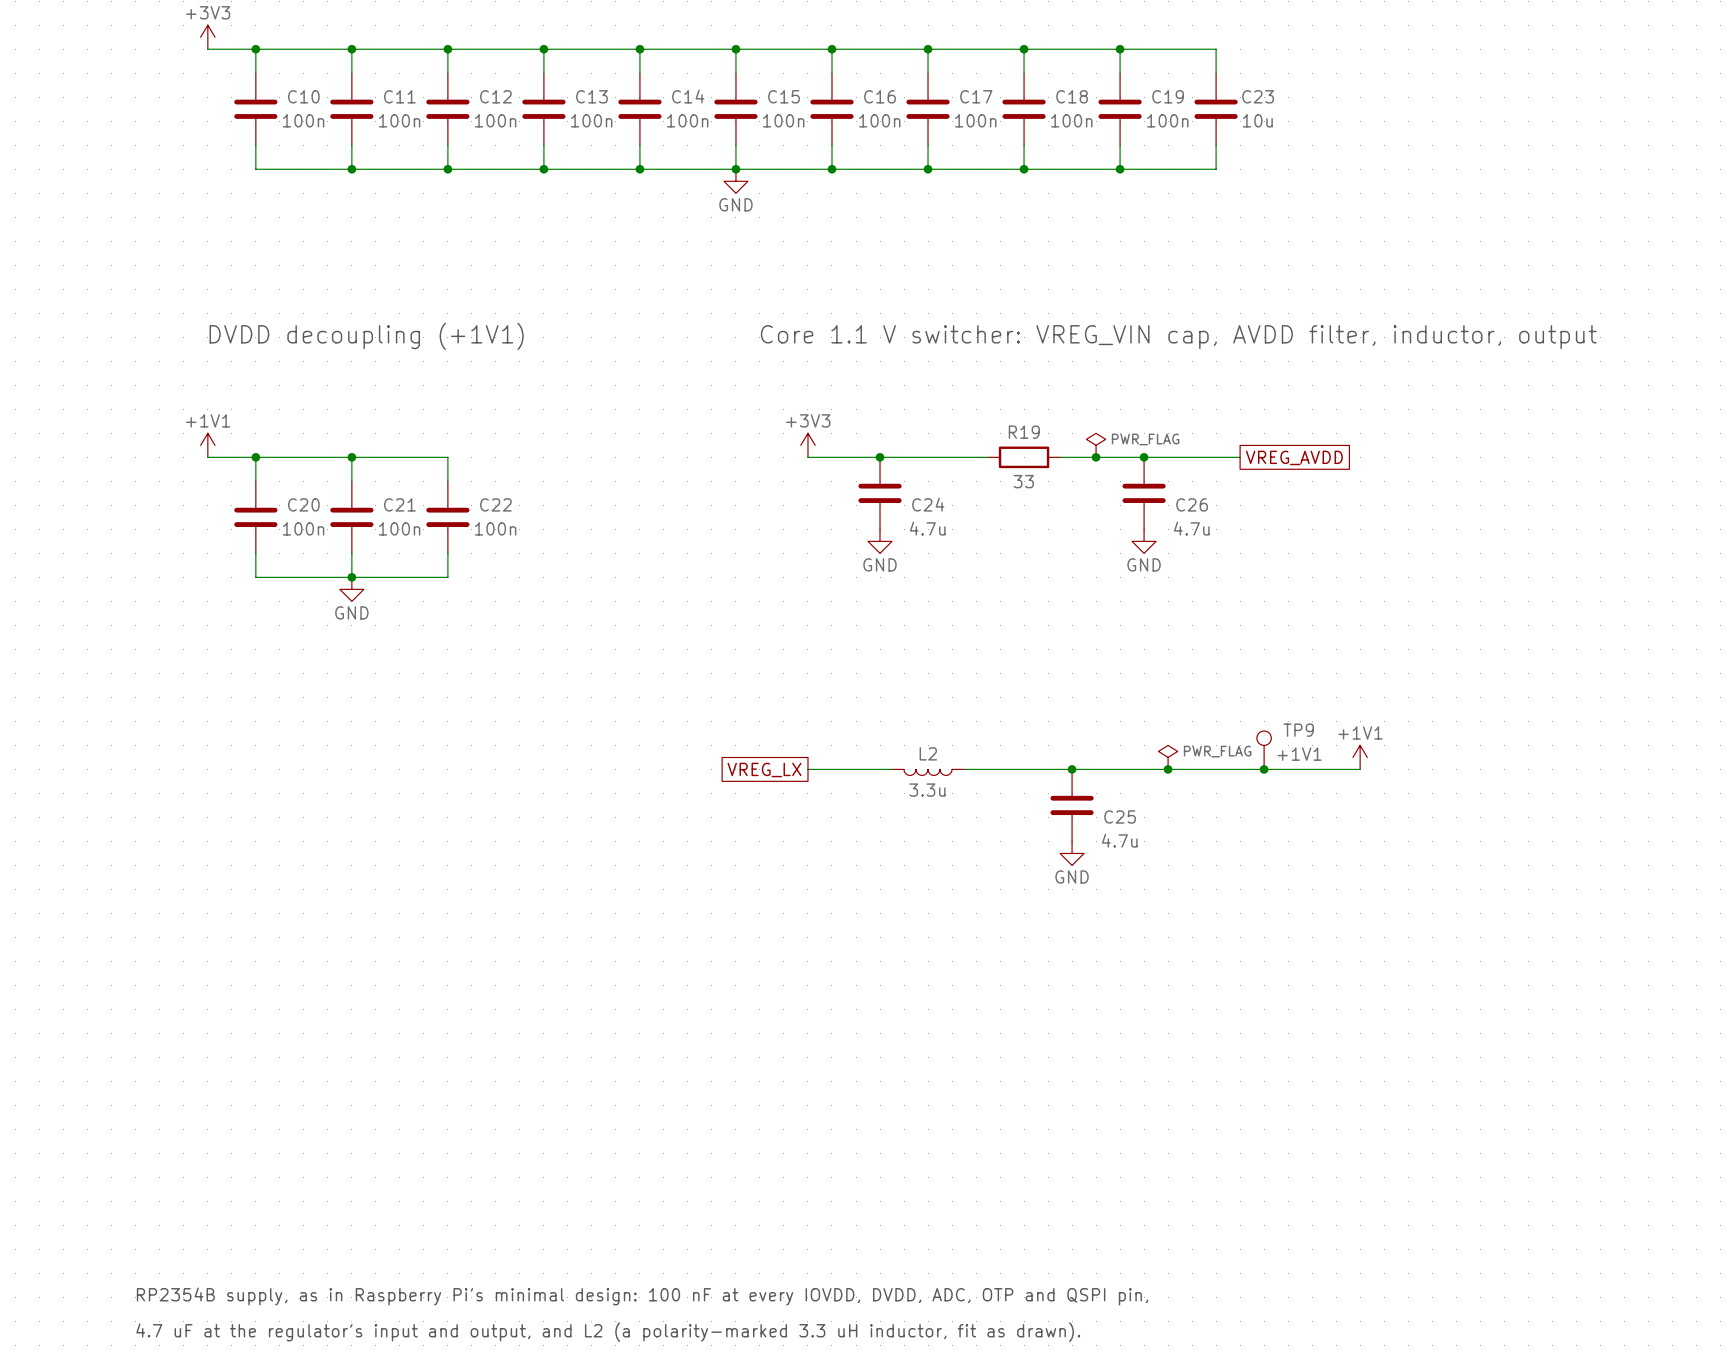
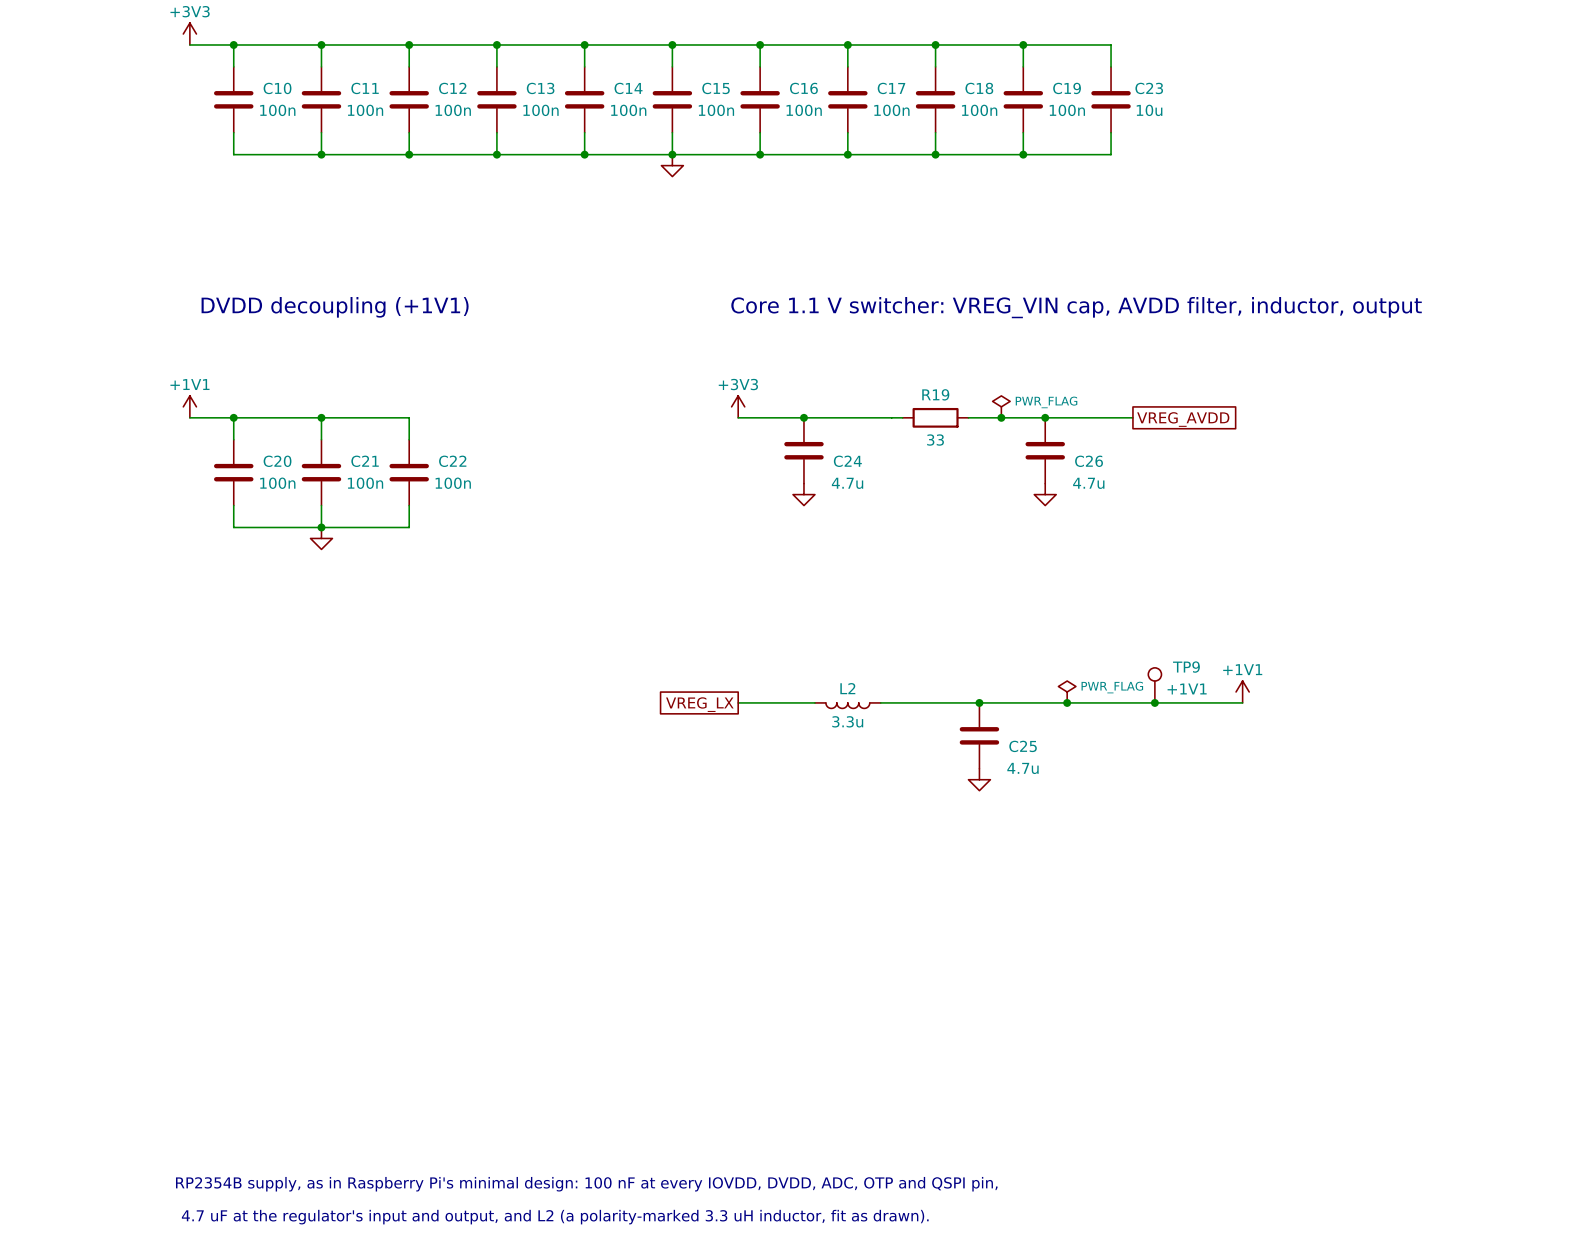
power symbol text: GND (735, 204) -> none
power symbol text: GND (880, 564) -> none
power symbol text: GND (1144, 564) -> none
power symbol text: GND (351, 612) -> none
power symbol text: GND (1072, 877) -> none

